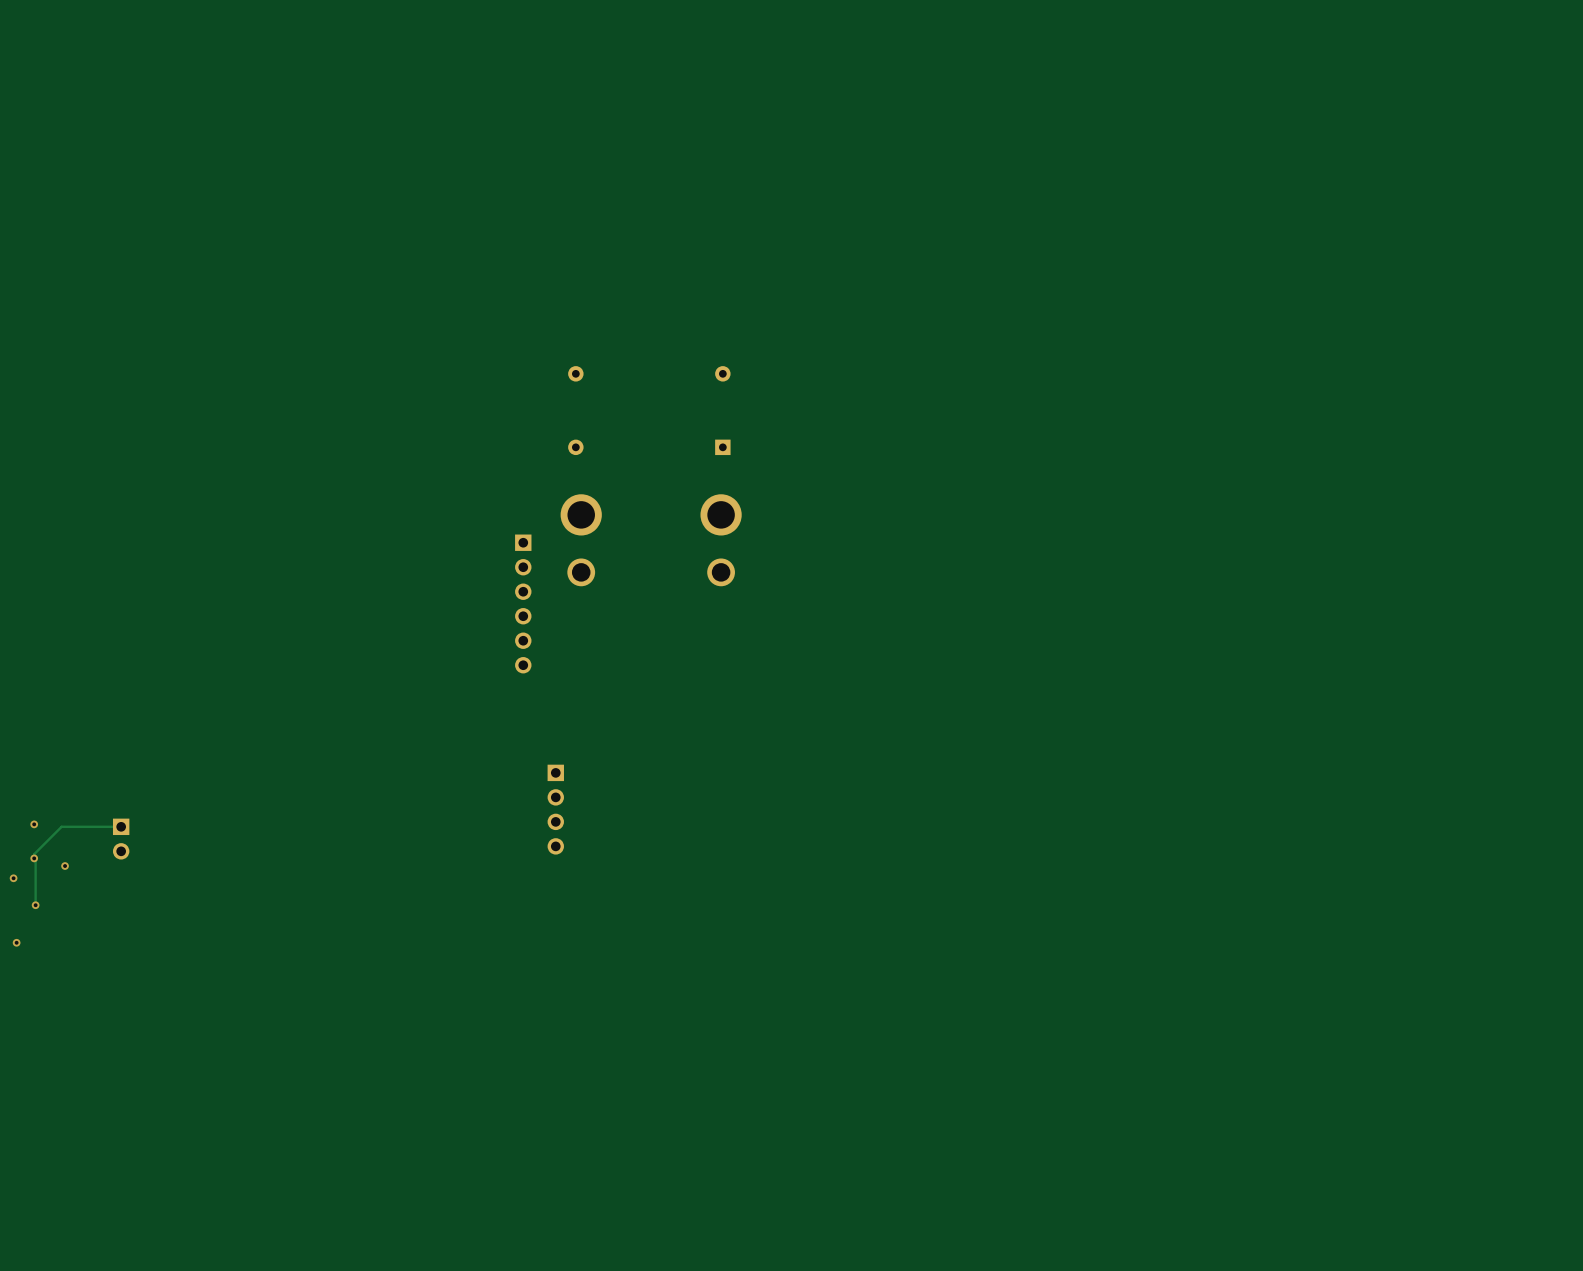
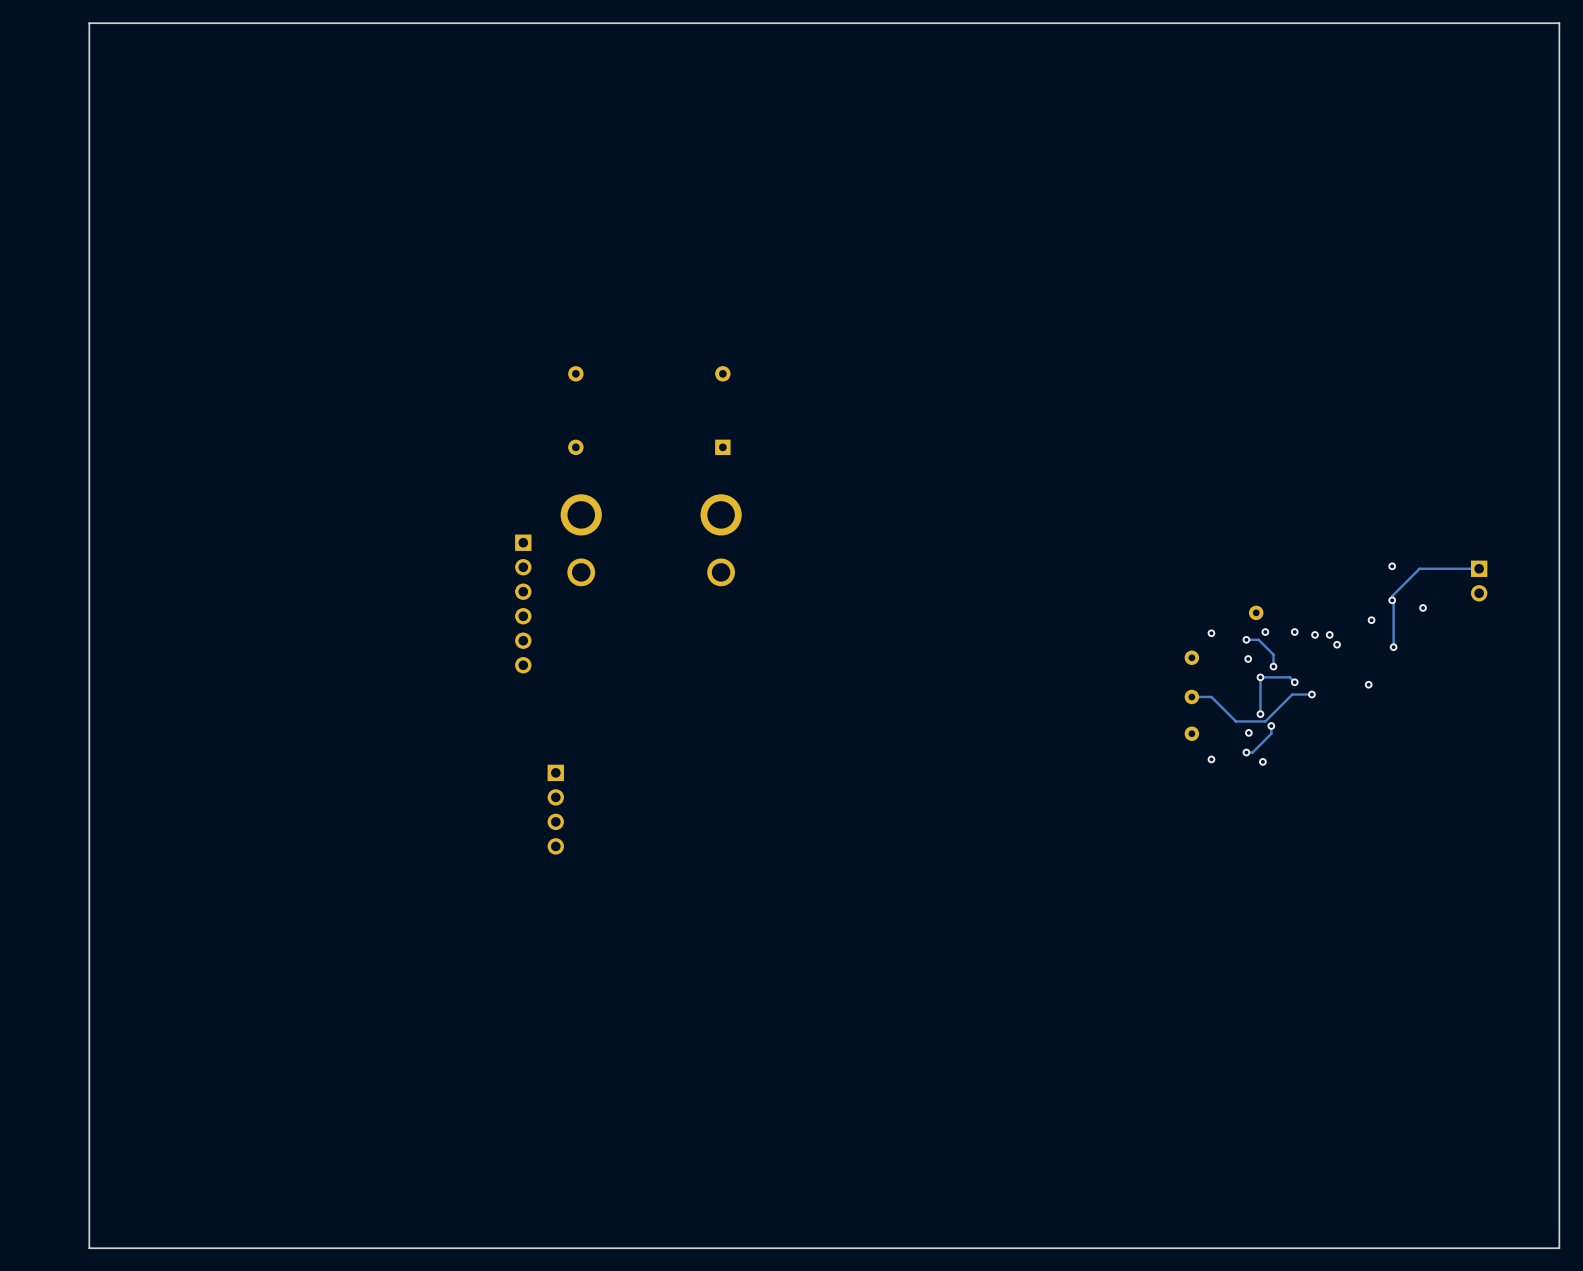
board edge: none -> (1559, 23) (1559, 1248) (89, 1248) (89, 23) (1559, 23)
via: none -> (1392, 566)
track: none -> (1479, 568) (1419, 568) (1392, 596) (1393, 647)
part: none -> (1479, 581)
via: none -> (1392, 600)
via: none -> (1423, 607)
part: none -> (1256, 612)
via: none -> (1371, 620)
via: none -> (1265, 632)
via: none -> (1294, 632)
via: none -> (1211, 633)
via: none -> (1315, 634)
via: none -> (1329, 634)
track: none -> (1246, 639) (1258, 639) (1273, 654) (1273, 666)
via: none -> (1246, 639)
via: none -> (1337, 644)
via: none -> (1393, 647)
part: none -> (1191, 657)
via: none -> (1248, 658)
via: none -> (1273, 666)
via: none -> (1260, 677)
track: none -> (1294, 682) (1289, 677) (1260, 677) (1260, 714)
via: none -> (1294, 682)
via: none -> (1368, 684)
track: none -> (1311, 694) (1292, 694) (1265, 721) (1235, 721) (1211, 696) (1191, 696)
via: none -> (1311, 694)
part: none -> (1191, 696)
via: none -> (1260, 714)
track: none -> (1271, 726) (1271, 733) (1252, 752) (1246, 752)
via: none -> (1271, 726)
via: none -> (1248, 732)
part: none -> (1191, 733)
via: none -> (1246, 752)
via: none -> (1211, 759)
via: none -> (1262, 761)
via: (34, 824) -> none
track: (121, 826) (61, 826) (34, 854) (35, 905) -> none
part: (121, 839) -> none
via: (34, 858) -> none
via: (65, 866) -> none
via: (13, 878) -> none
via: (35, 905) -> none
via: (16, 942) -> none

